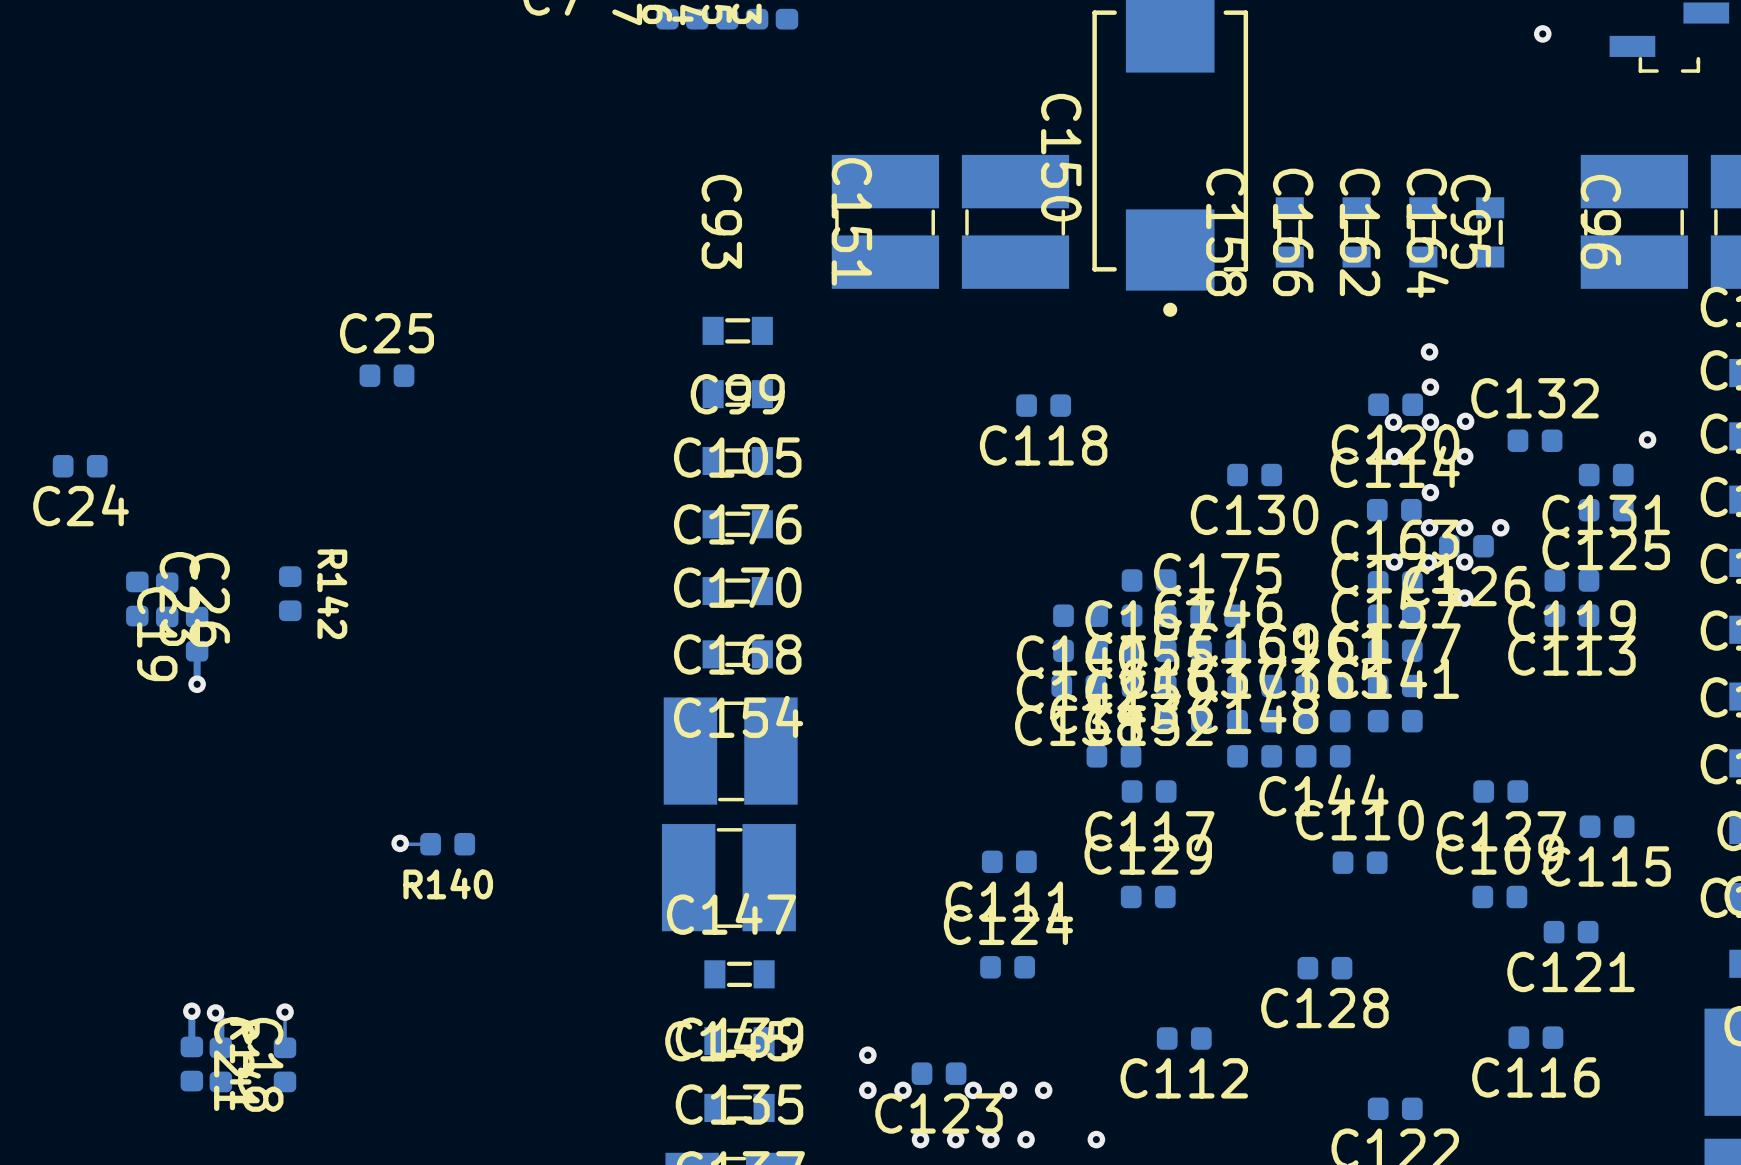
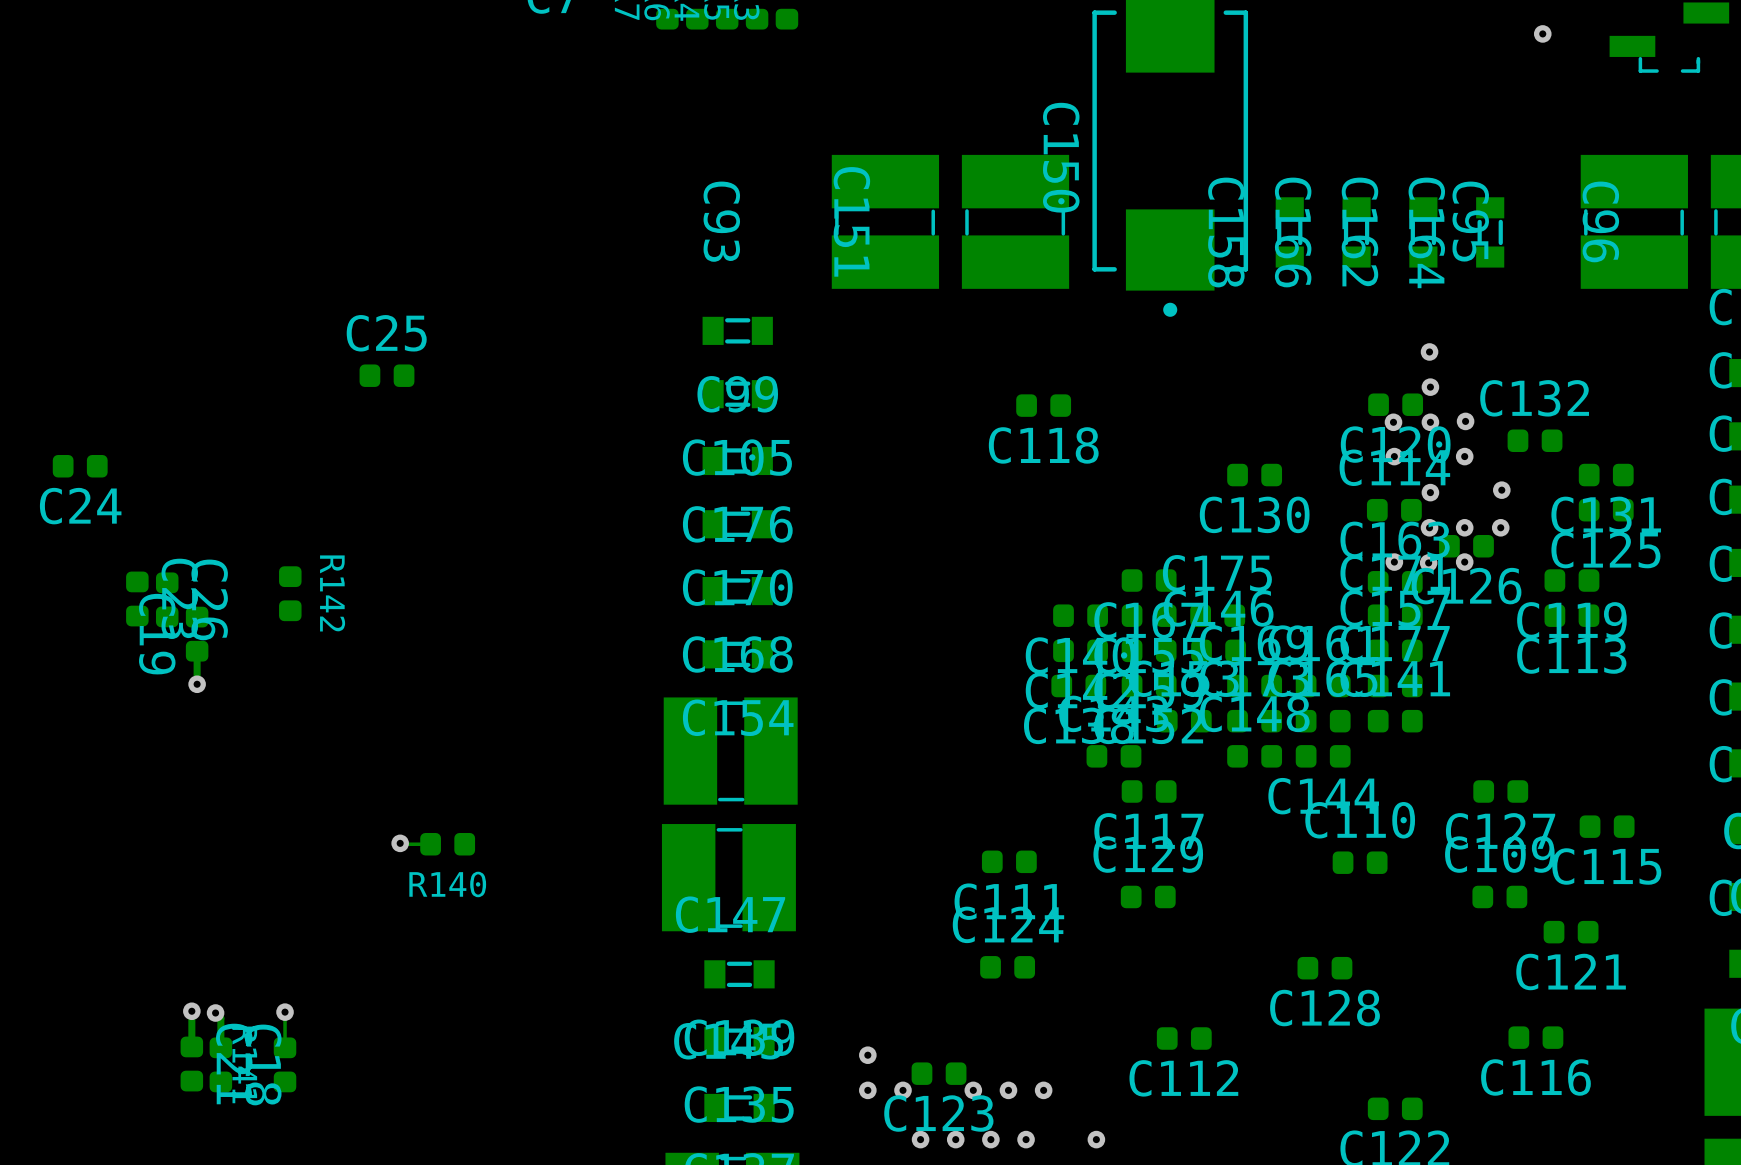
via: (1647, 439) -> none
via: none -> (1501, 490)
via: (1464, 598) -> none

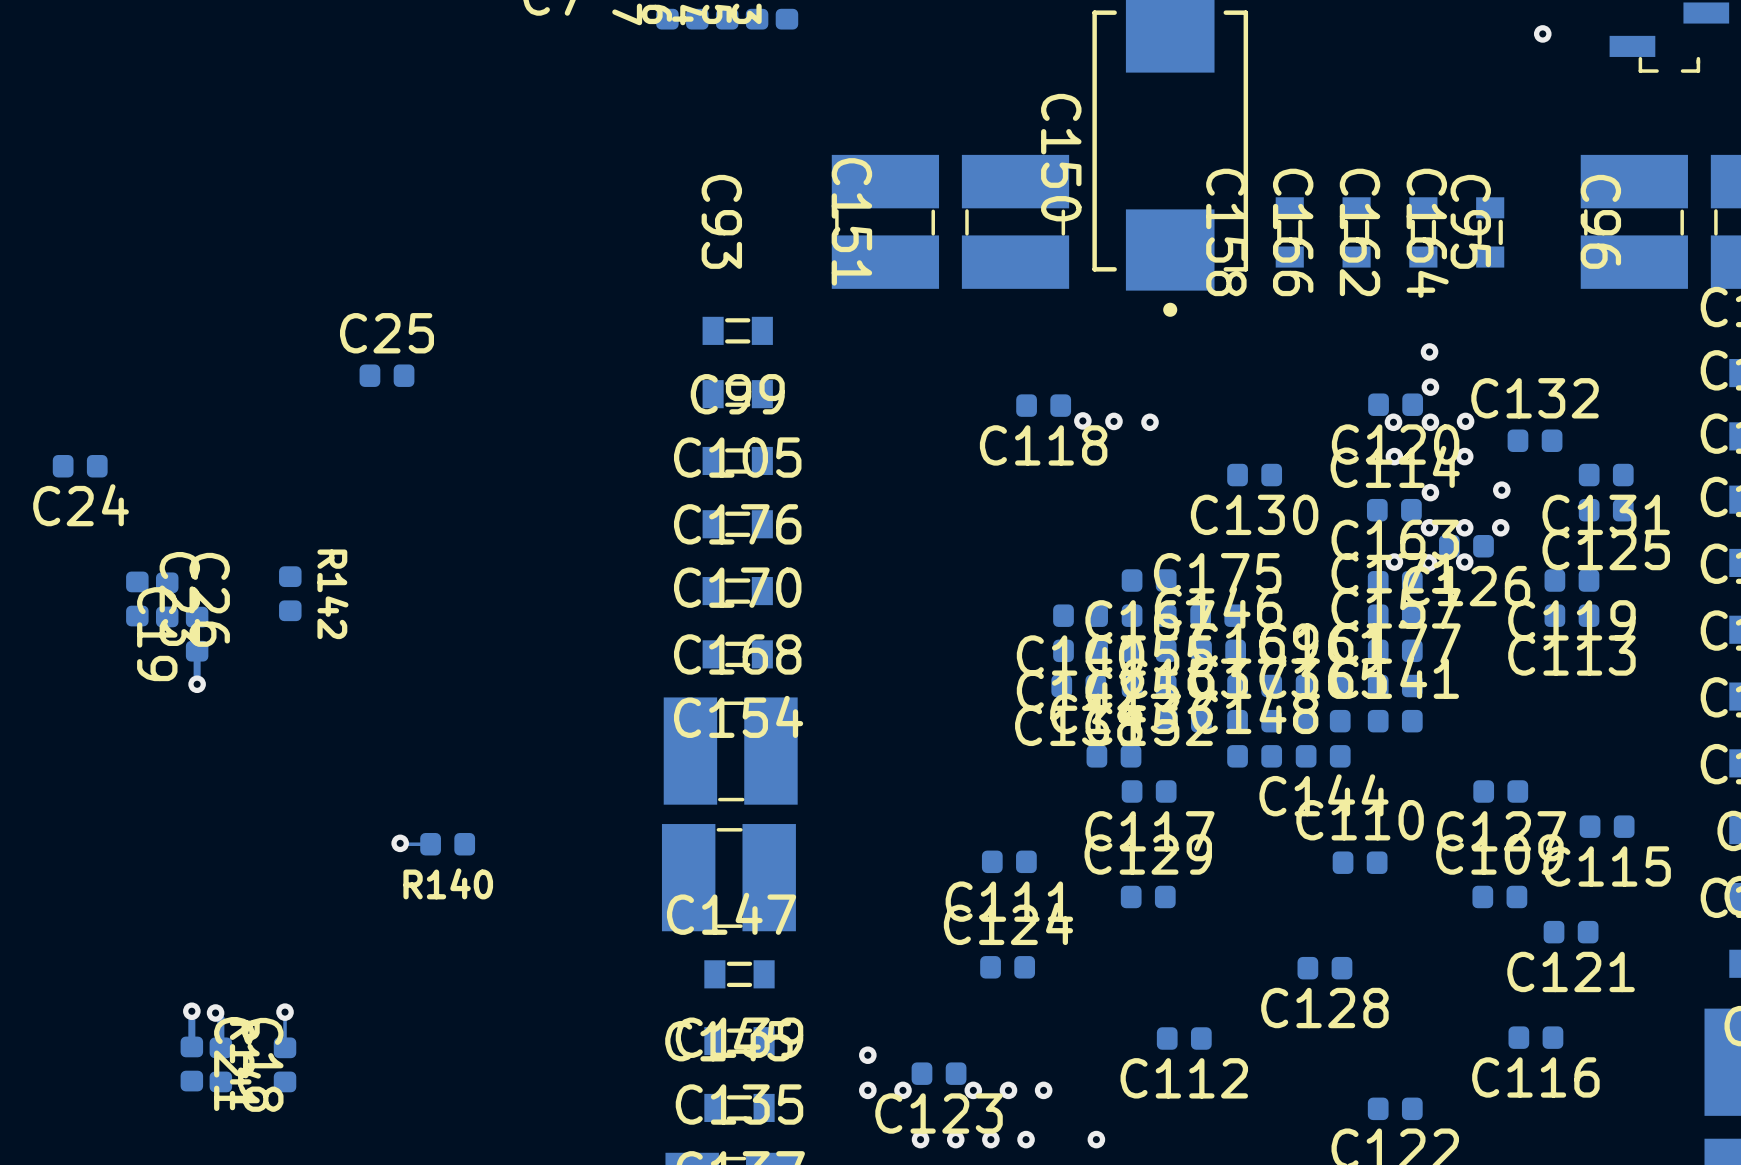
via: none -> (1082, 420)
via: none -> (1113, 421)
via: none -> (1150, 422)

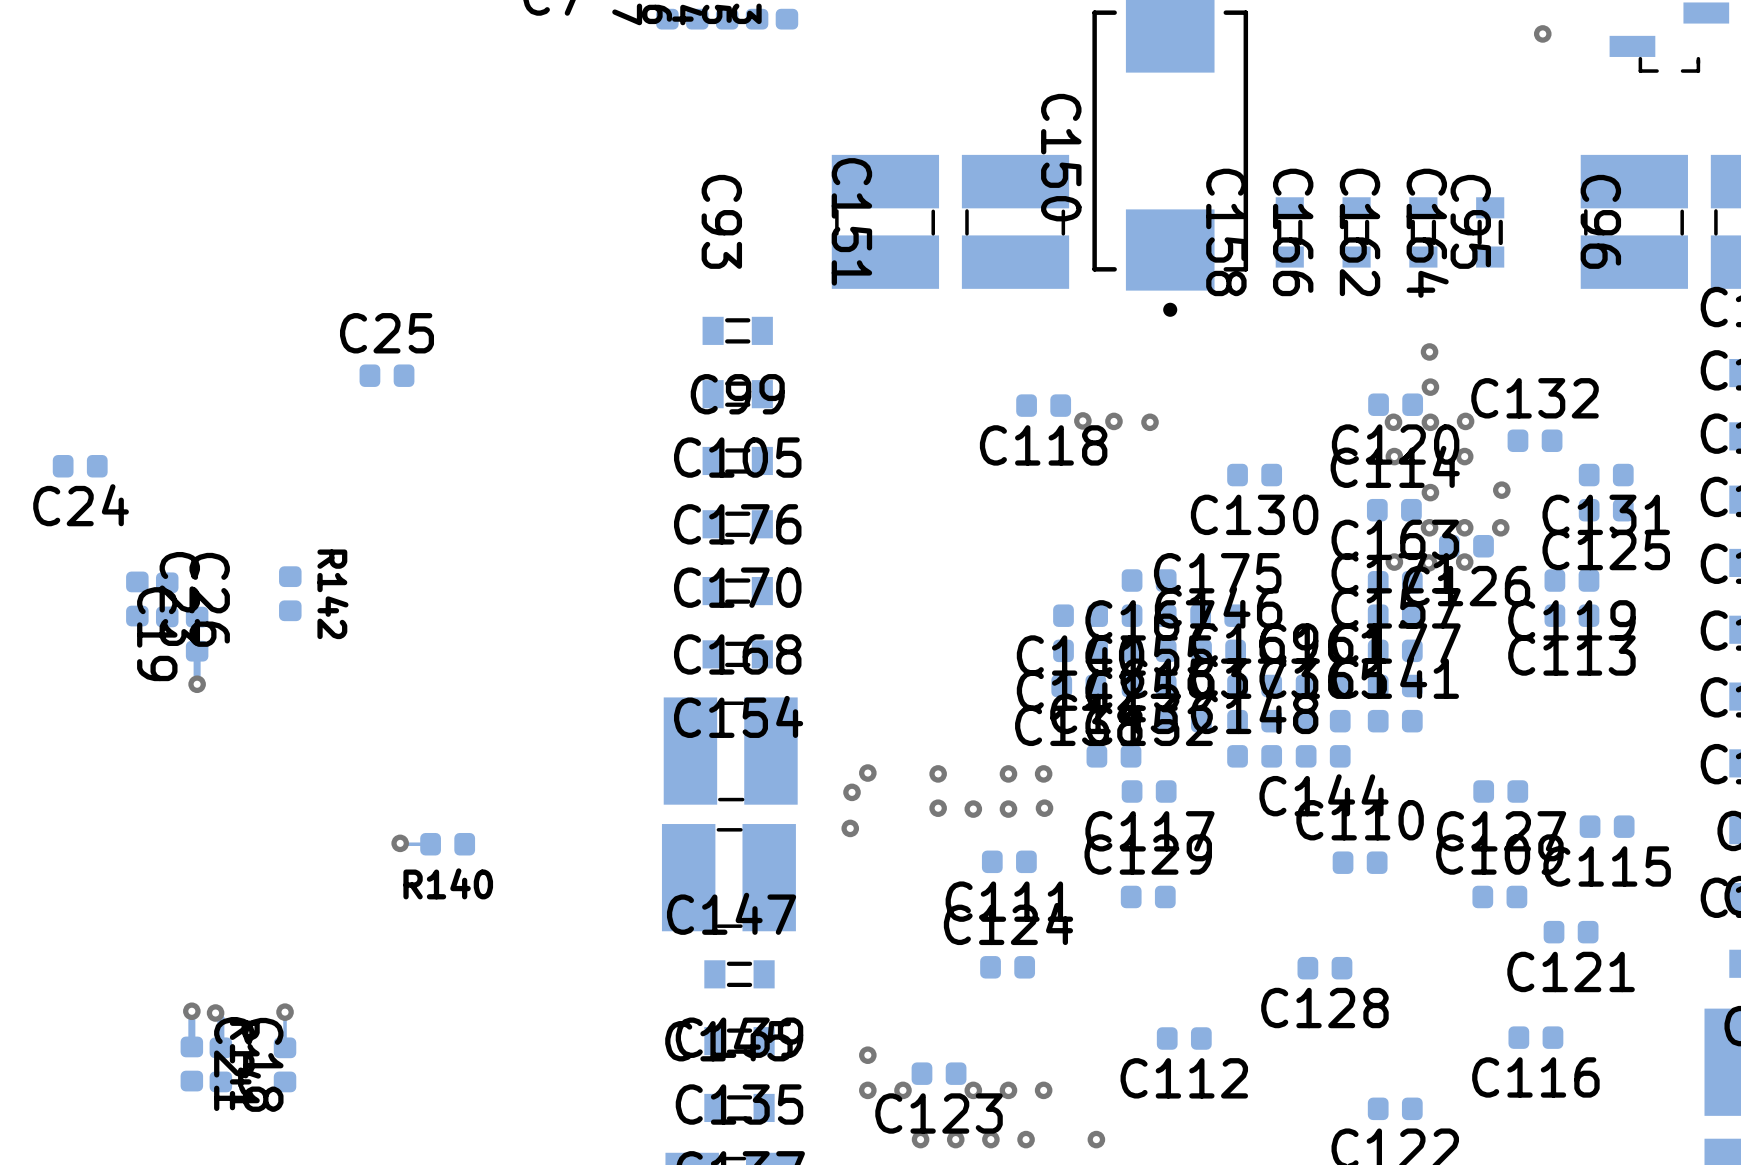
via: none -> (867, 773)
via: none -> (938, 773)
via: none -> (1008, 773)
via: none -> (1043, 773)
via: none -> (852, 792)
via: none -> (938, 808)
via: none -> (1044, 808)
via: none -> (973, 809)
via: none -> (1008, 809)
via: none -> (850, 828)

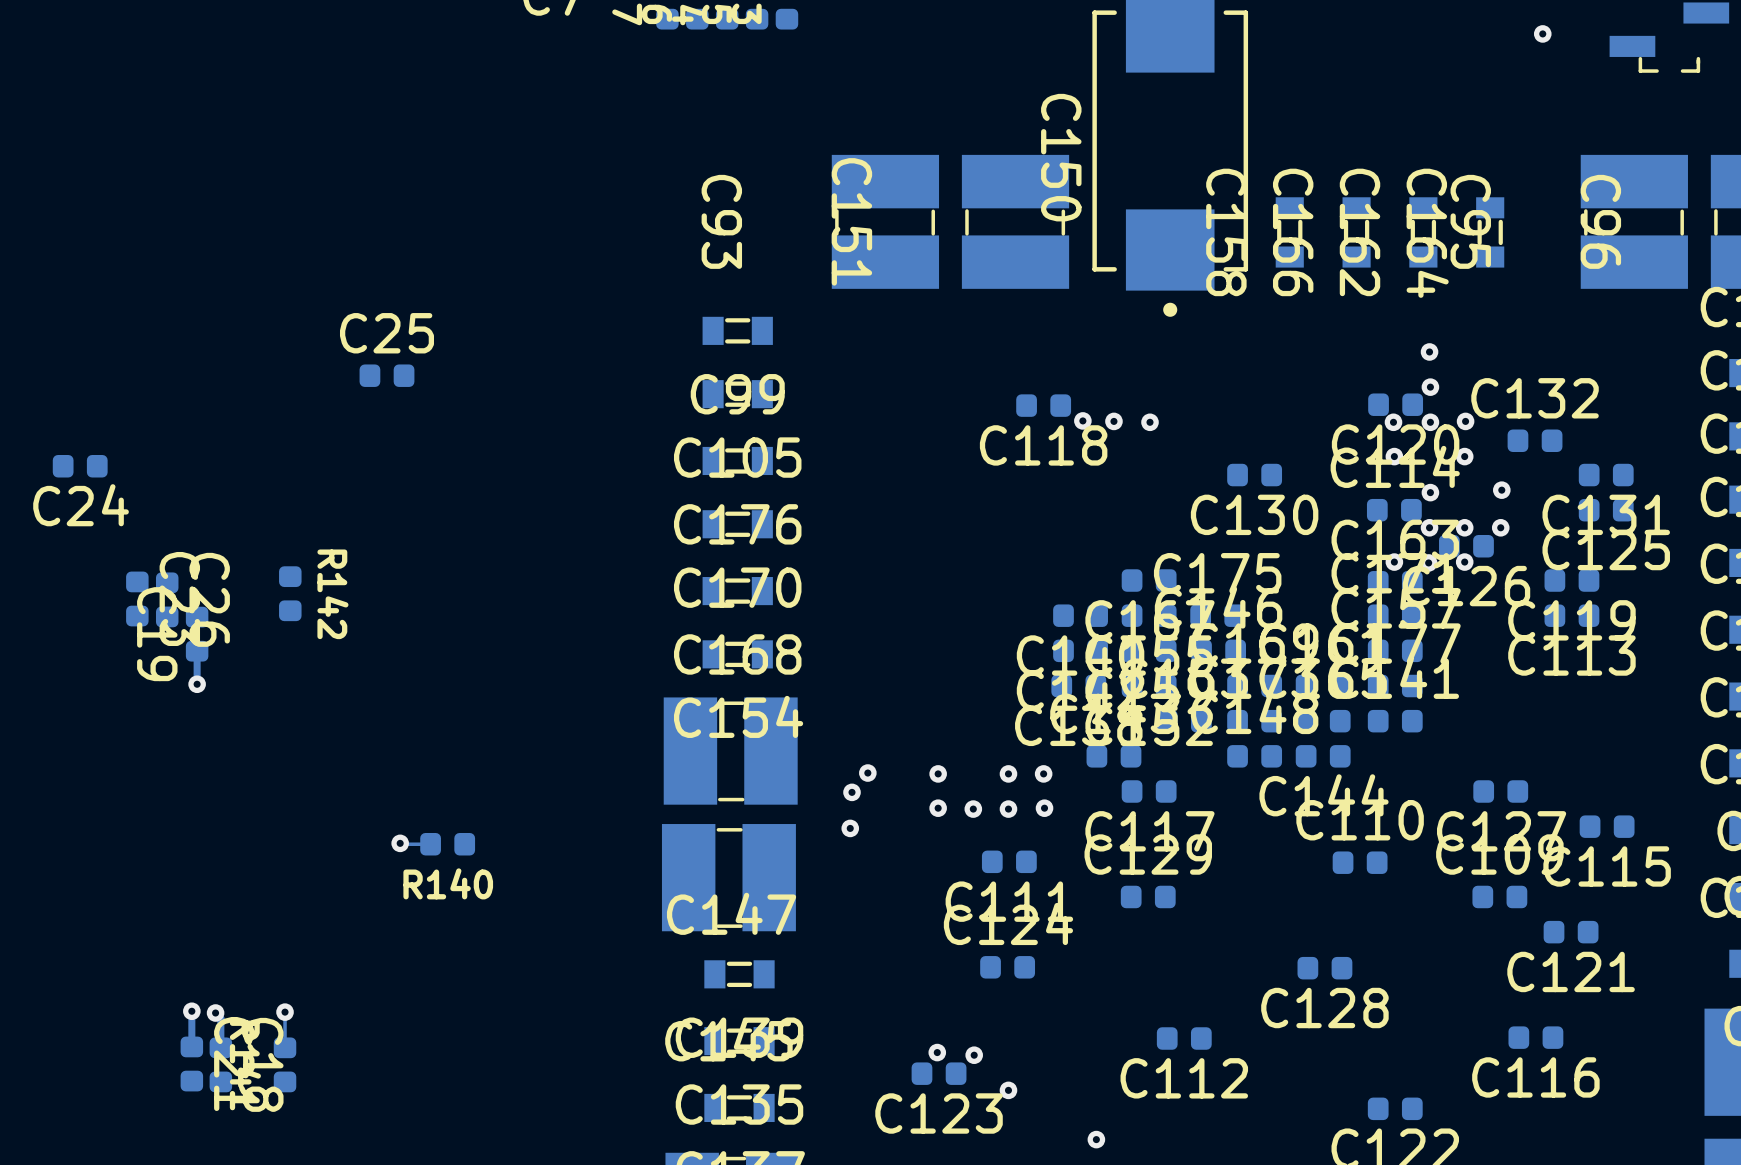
via: none -> (937, 1052)
via: (867, 1055) -> none
via: none -> (974, 1055)
via: (867, 1090) -> none
via: (902, 1090) -> none
via: (973, 1090) -> none
via: (1043, 1090) -> none
via: (920, 1139) -> none
via: (955, 1139) -> none
via: (990, 1139) -> none
via: (1026, 1139) -> none

